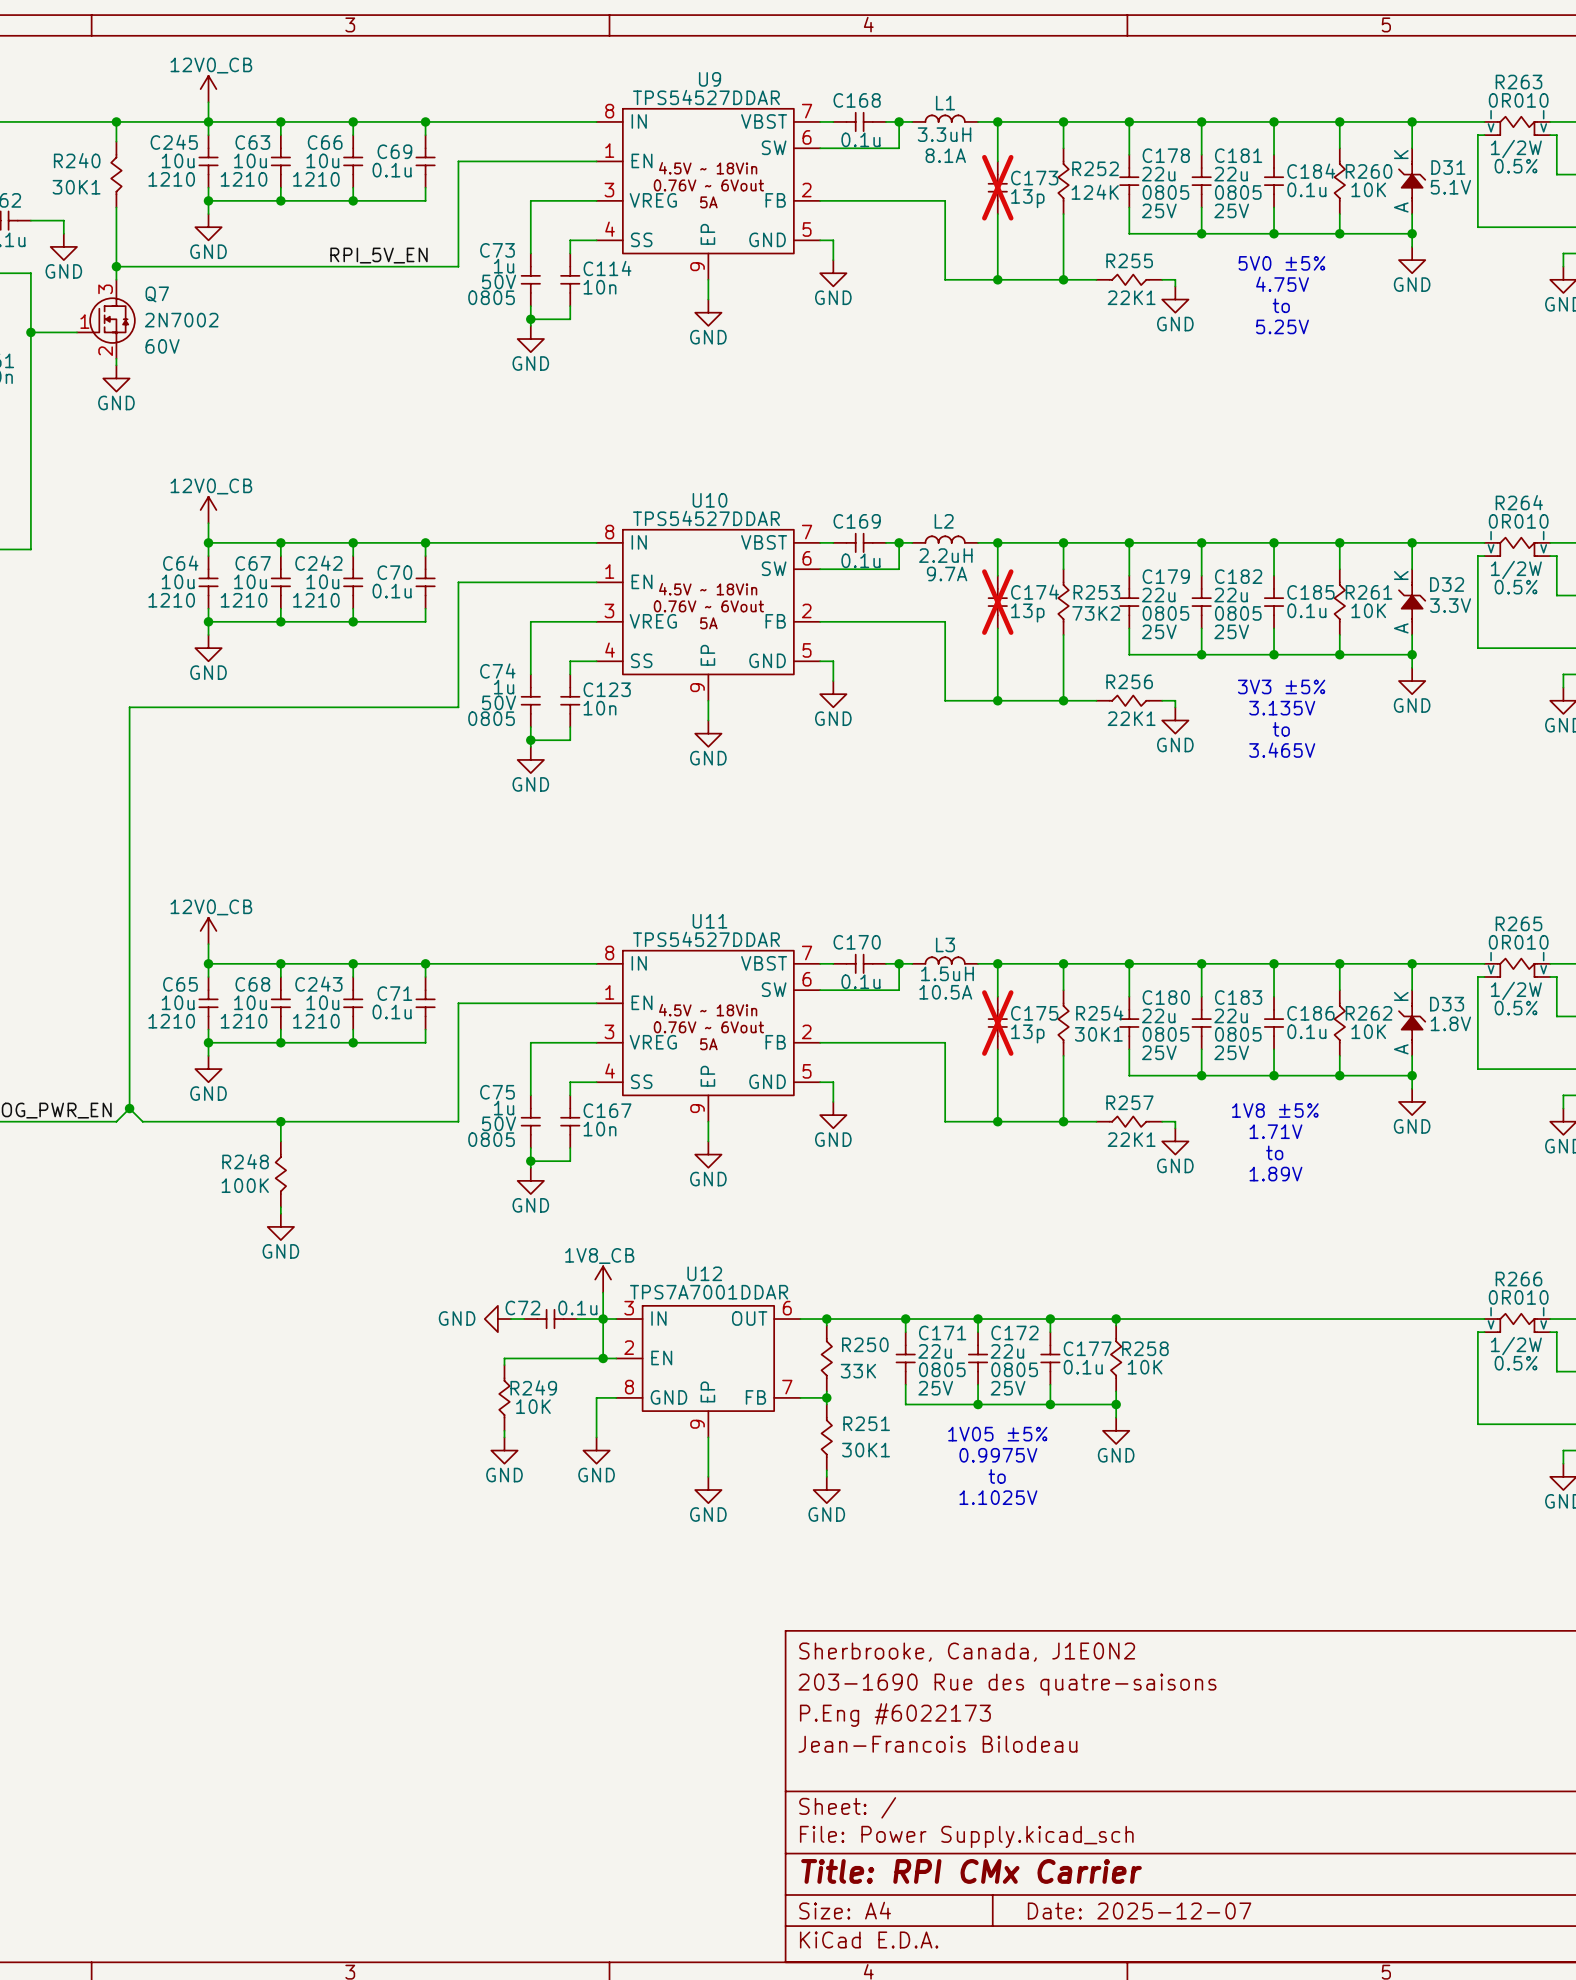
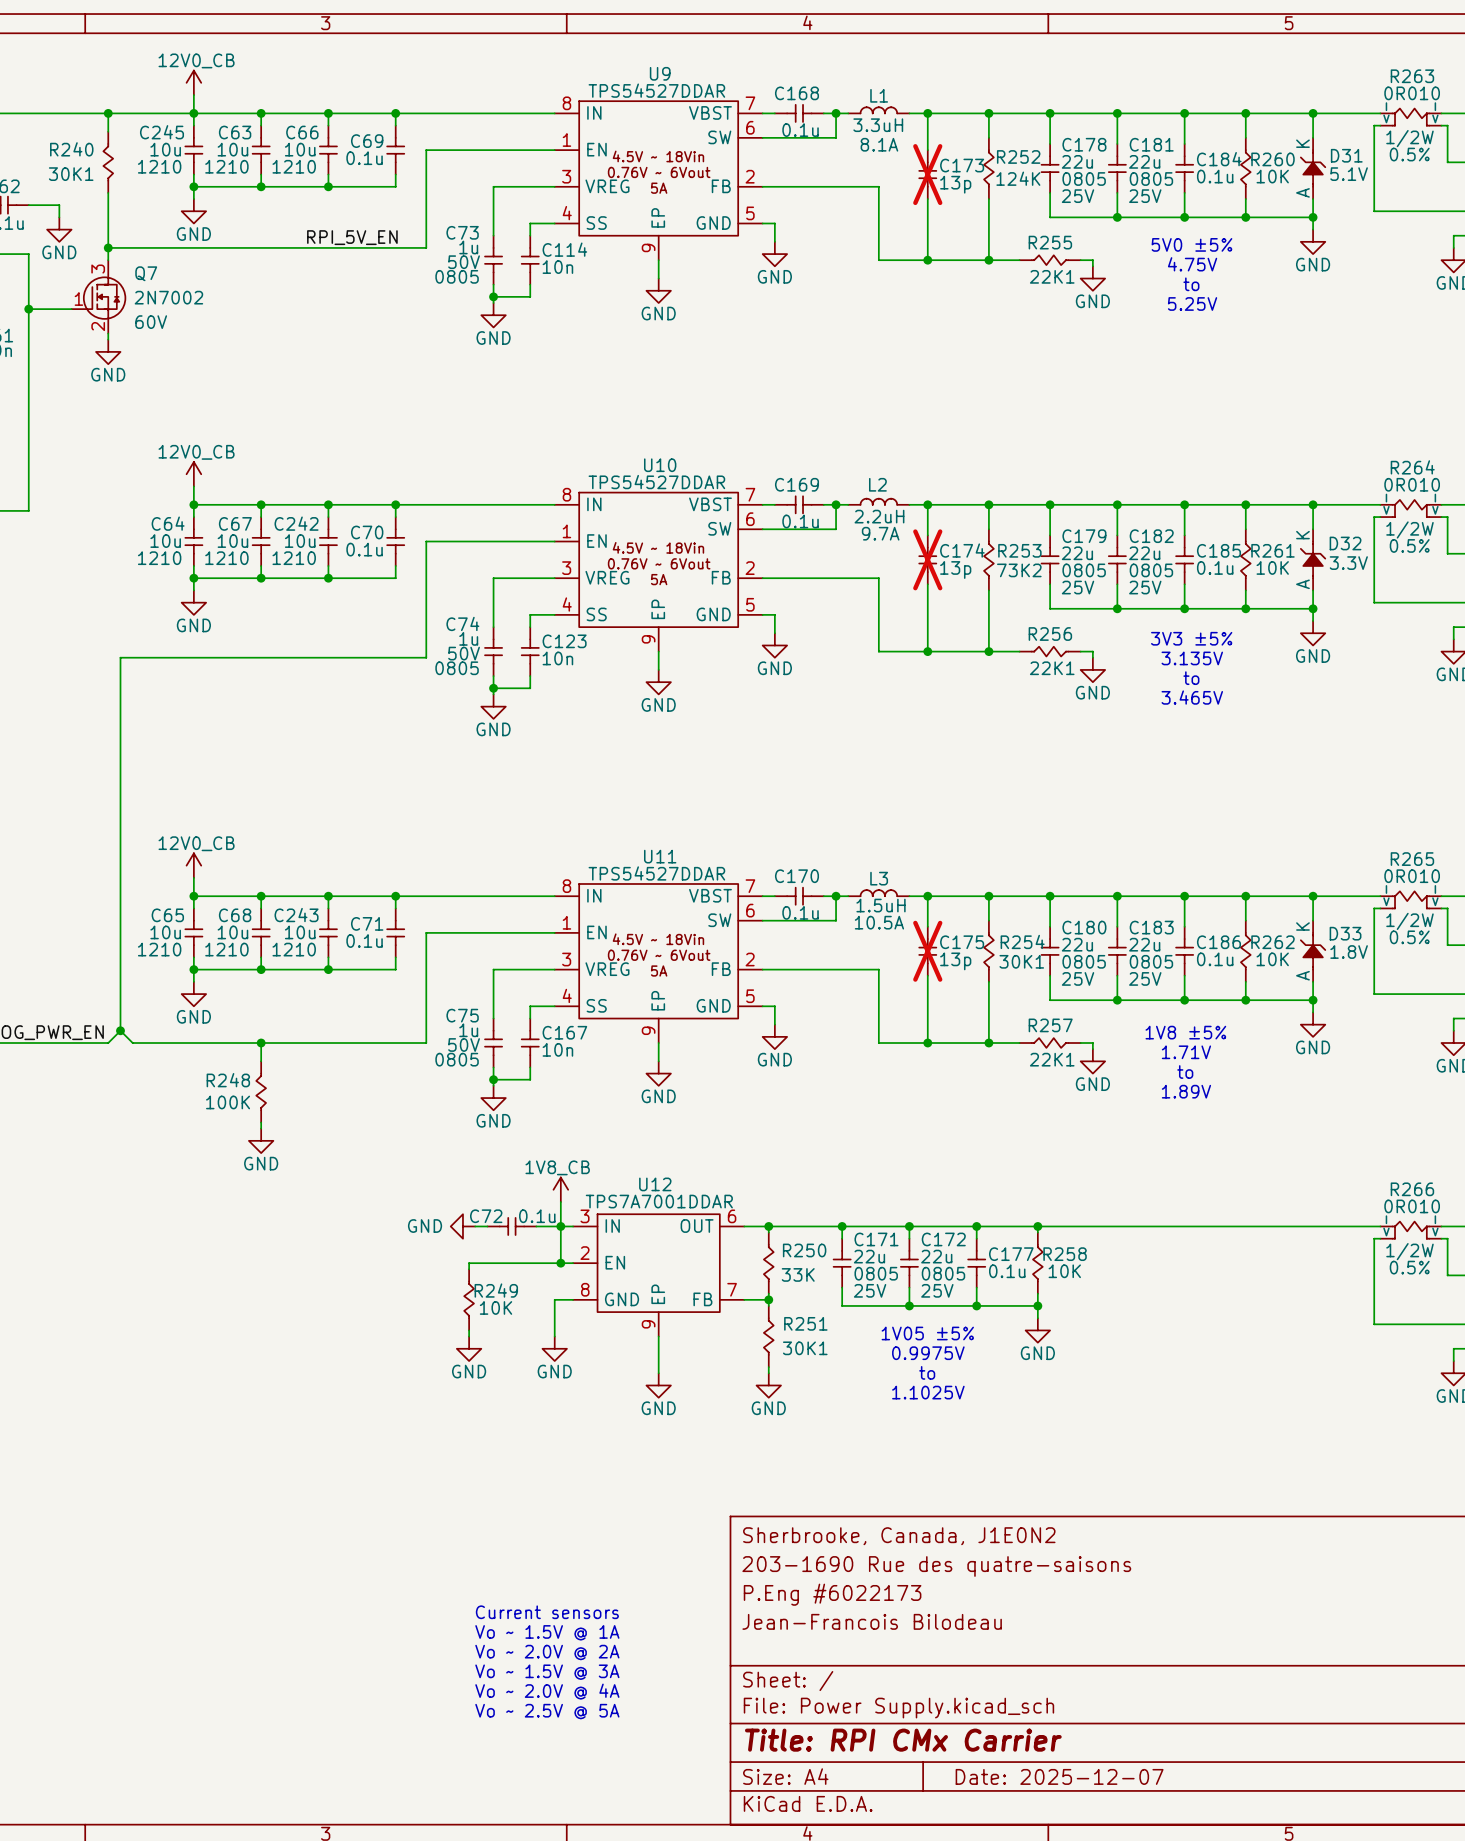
text: none -> Current sensors (547, 1612)
text: none -> Vo ~ 1.5V @ 1A (547, 1632)
text: none -> Vo ~ 2.0V @ 2A (547, 1652)
text: none -> Vo ~ 1.5V @ 3A (547, 1672)
text: none -> Vo ~ 2.0V @ 4A (547, 1691)
text: none -> Vo ~ 2.5V @ 5A (547, 1711)

